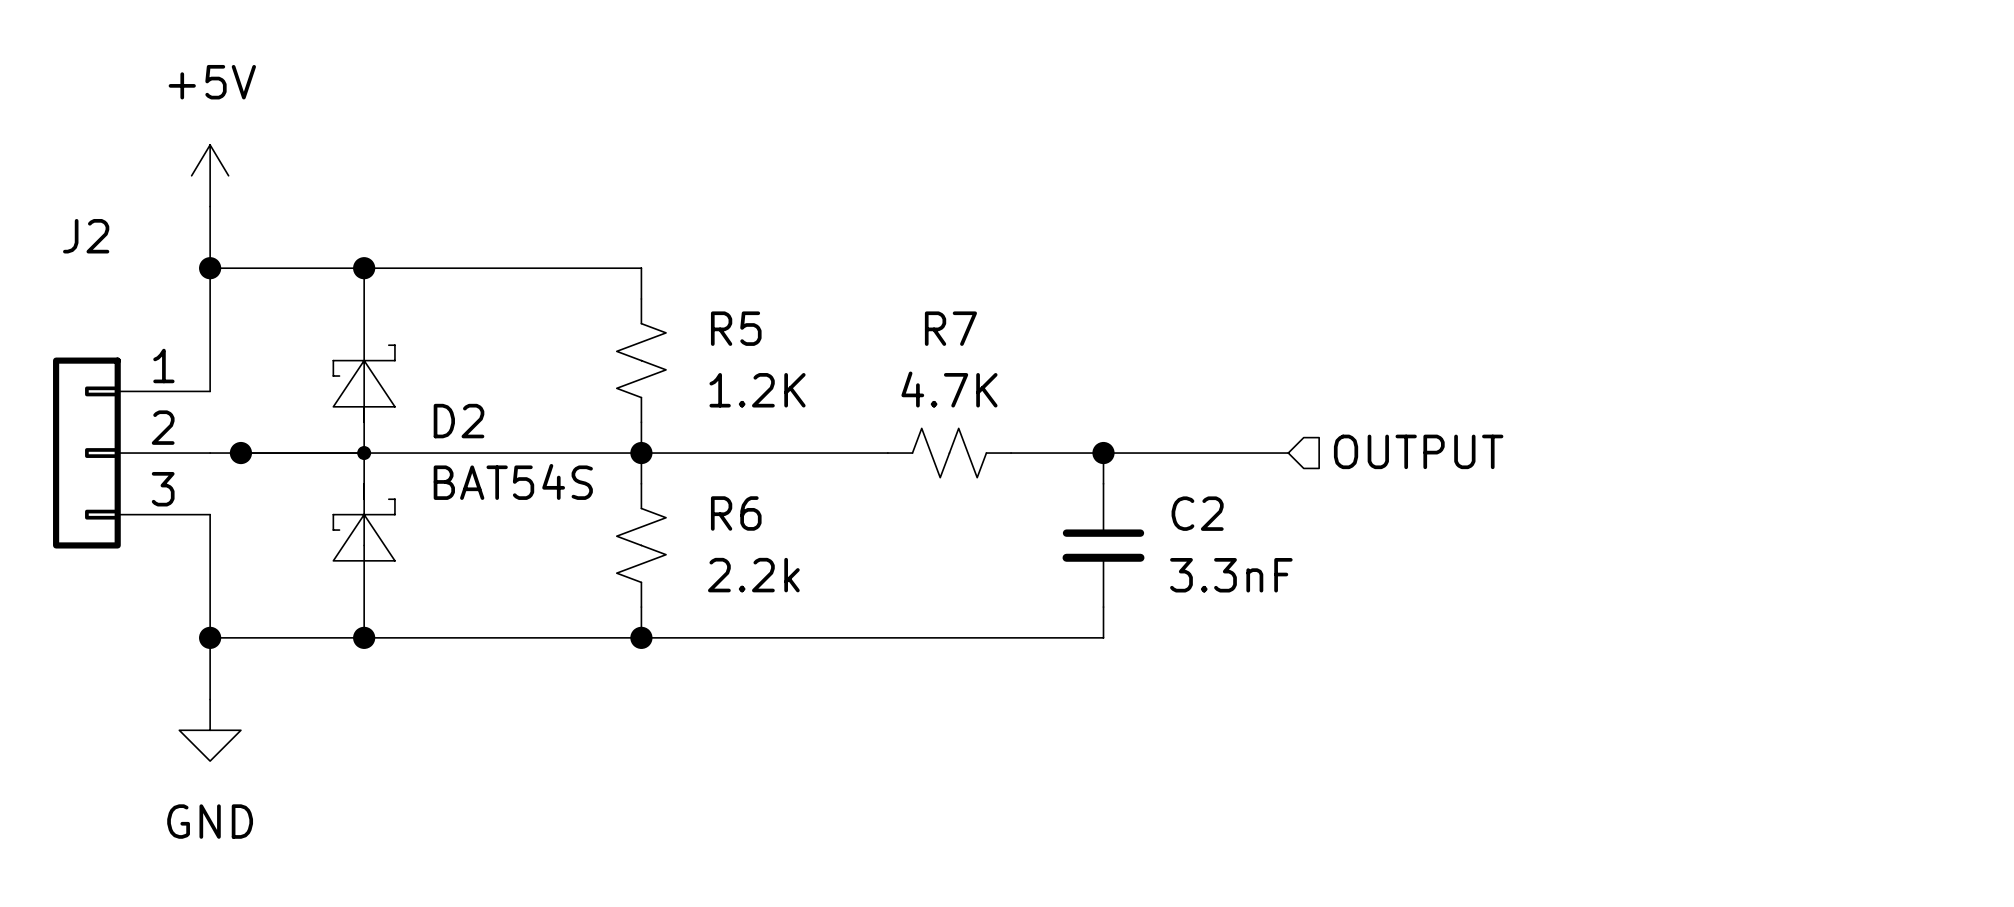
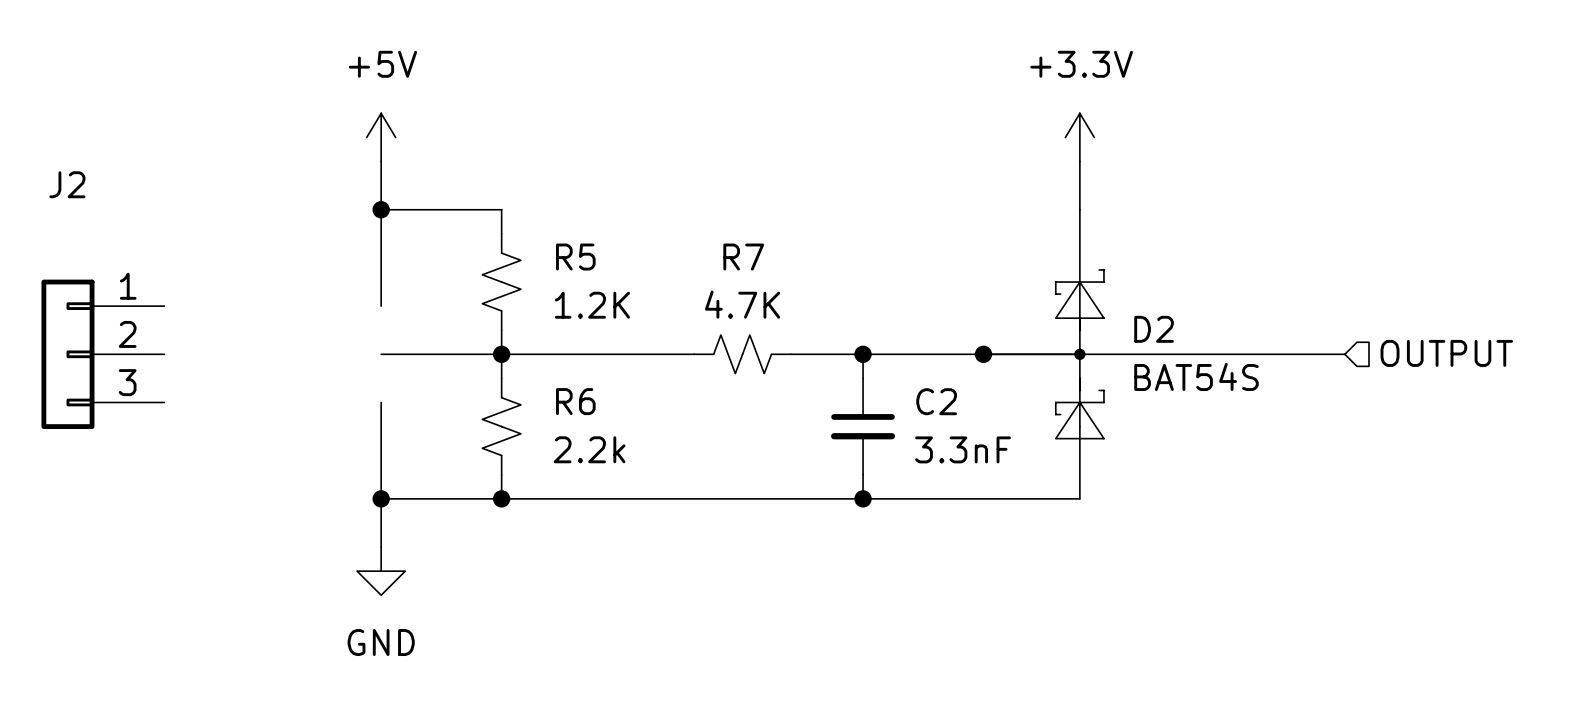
power symbol position: +5V (210, 175) -> +5V (381, 137)
power symbol: none -> +3.3V (1079, 137)
wire: (210, 206) (210, 391) -> (381, 161) (381, 306)
wire: none -> (1079, 161) (1079, 209)
wire: (210, 268) (487, 268) -> none
junction: (210, 268) -> none
junction position: (364, 268) -> (381, 209)
hierarchical label position: OUTPUT (1418, 451) -> OUTPUT (1446, 353)
wire: (210, 453) (487, 453) -> none
junction: (240, 453) -> none
D2 position: (317, 453) -> (1043, 354)
junction: none -> (983, 354)
wire: none -> (1007, 354) (1344, 354)
wire: (210, 514) (210, 699) -> (381, 402) (381, 547)
wire: (210, 637) (487, 637) -> none
junction: (210, 637) -> none
junction position: (364, 637) -> (381, 498)
wire: none -> (863, 498) (1079, 498)
junction: none -> (863, 498)
power symbol position: GND (210, 730) -> GND (381, 571)

